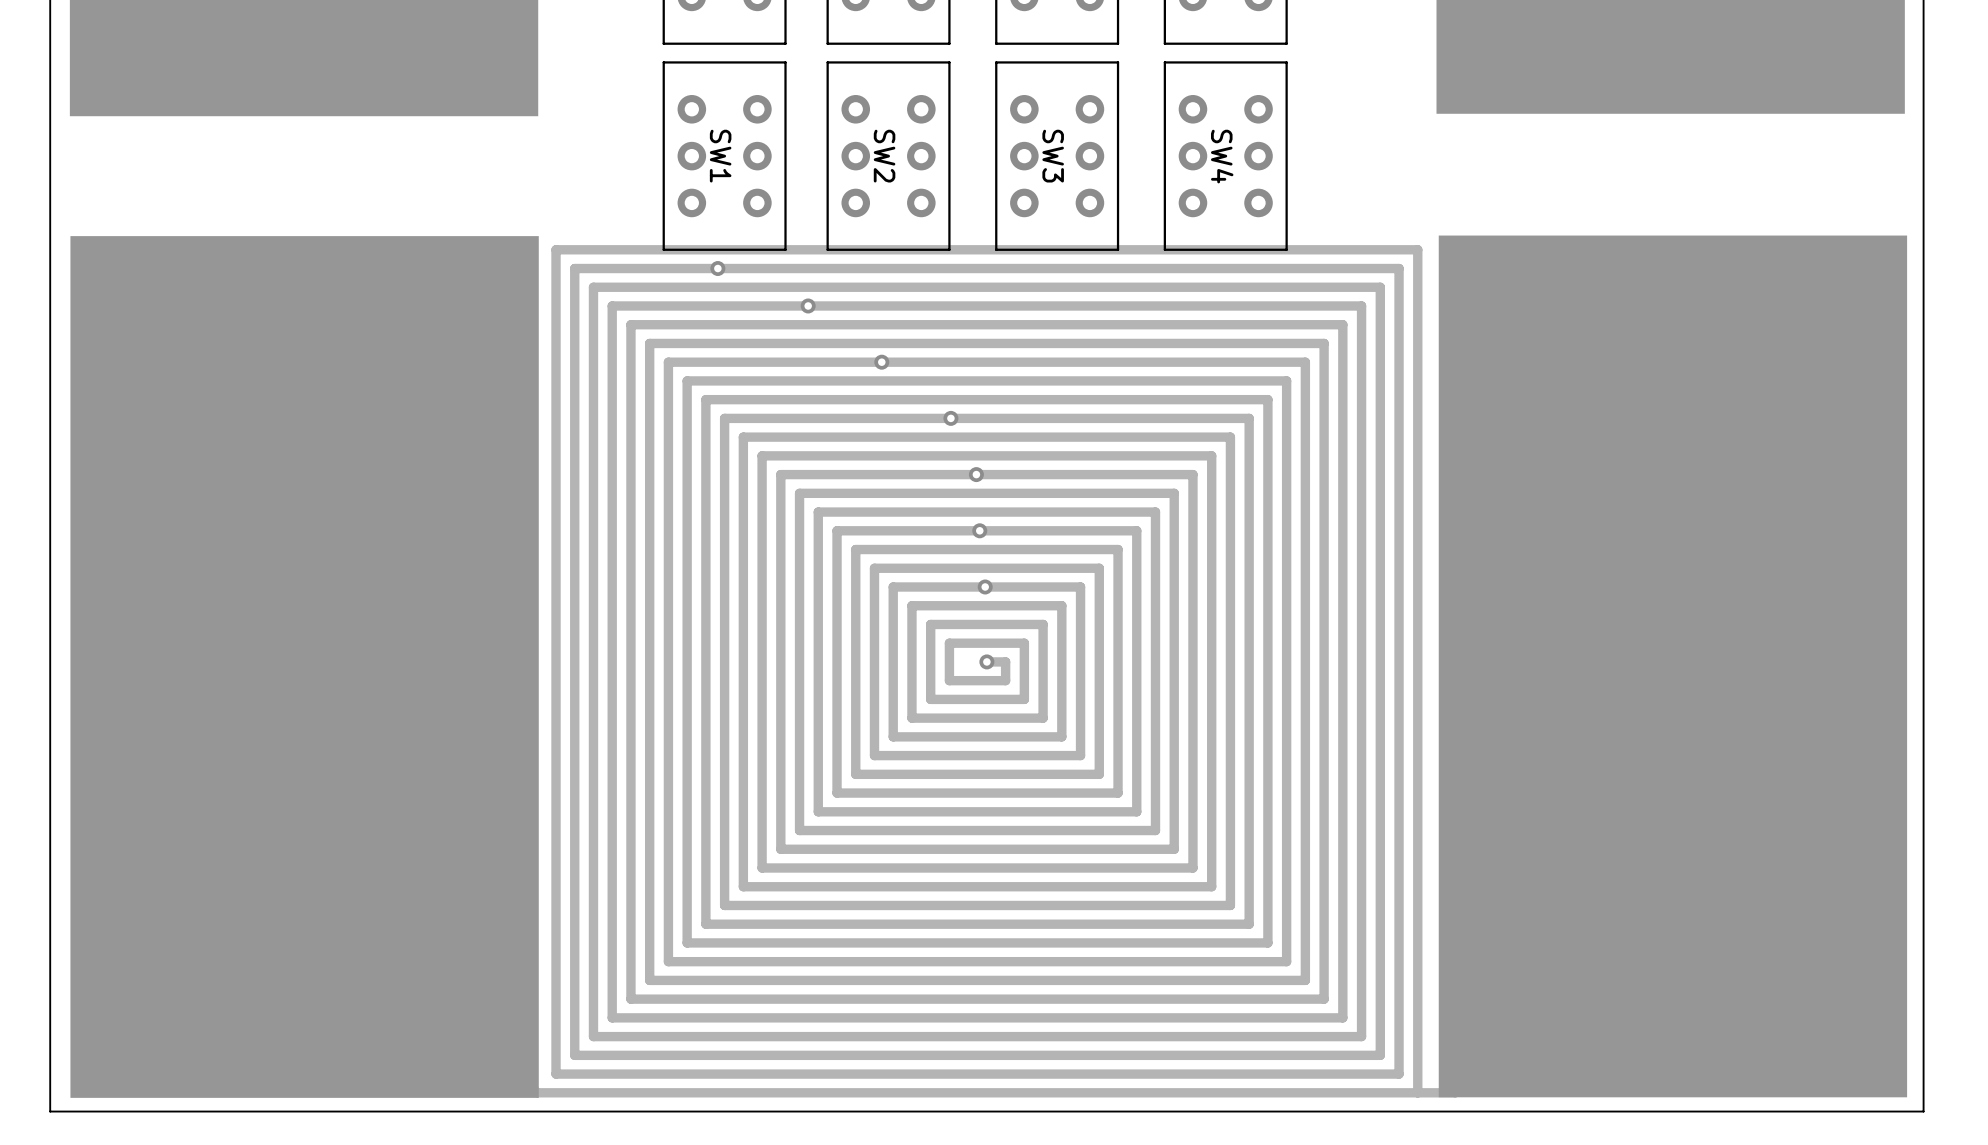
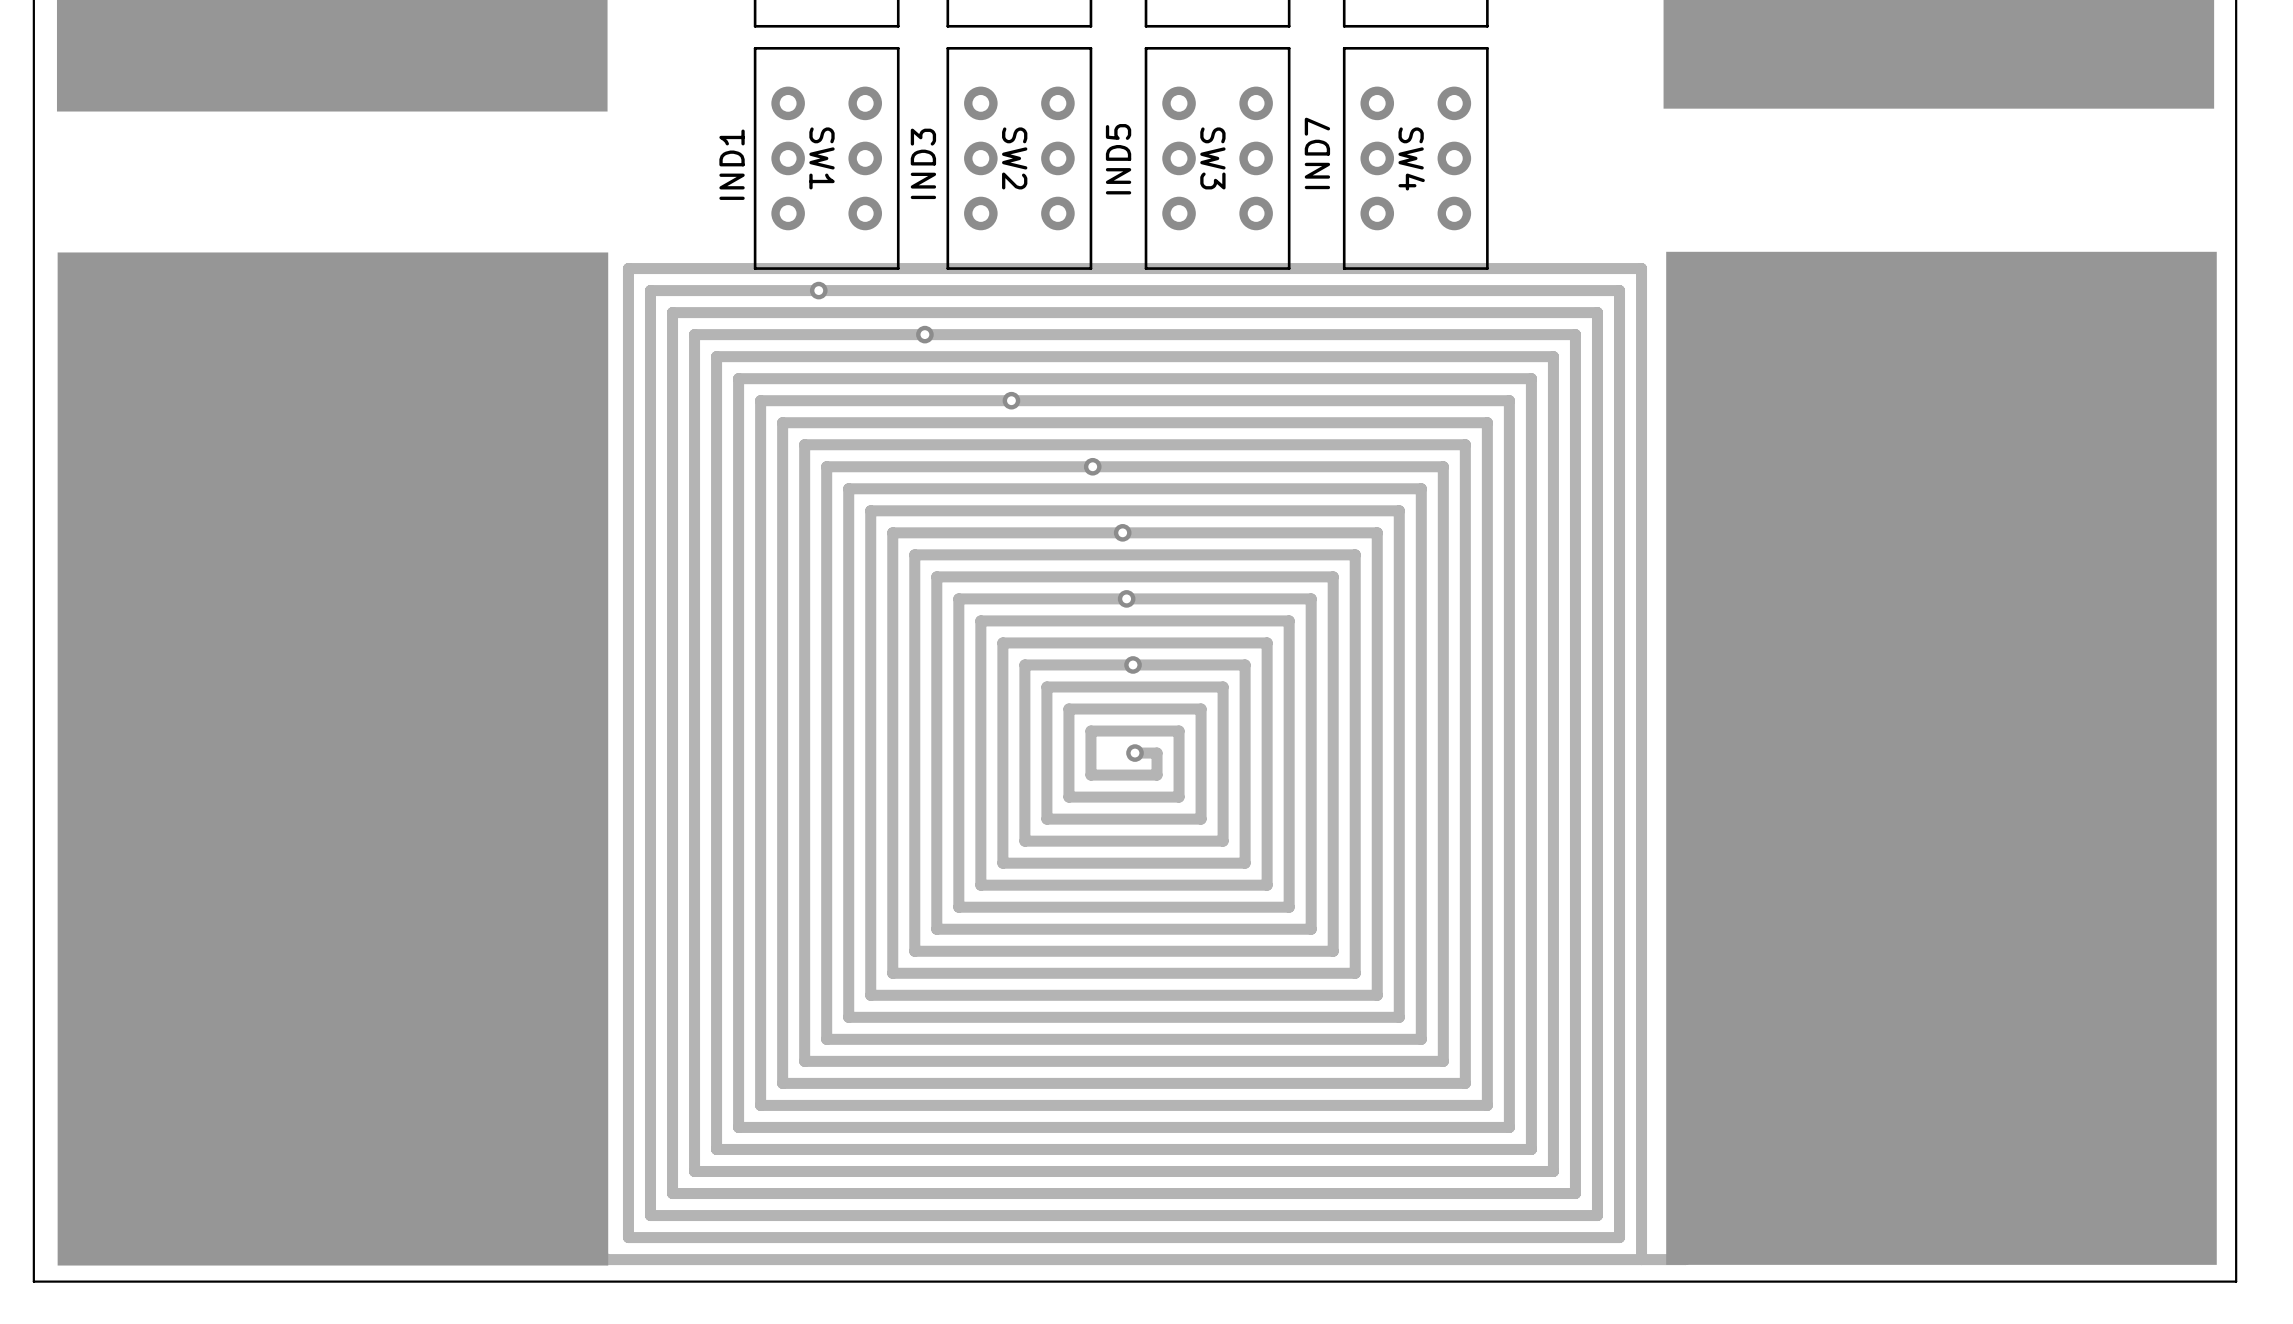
text: none -> IND7 (1317, 153)
text: none -> IND5 (1118, 159)
text: none -> IND3 (923, 163)
text: none -> IND1 (732, 164)

